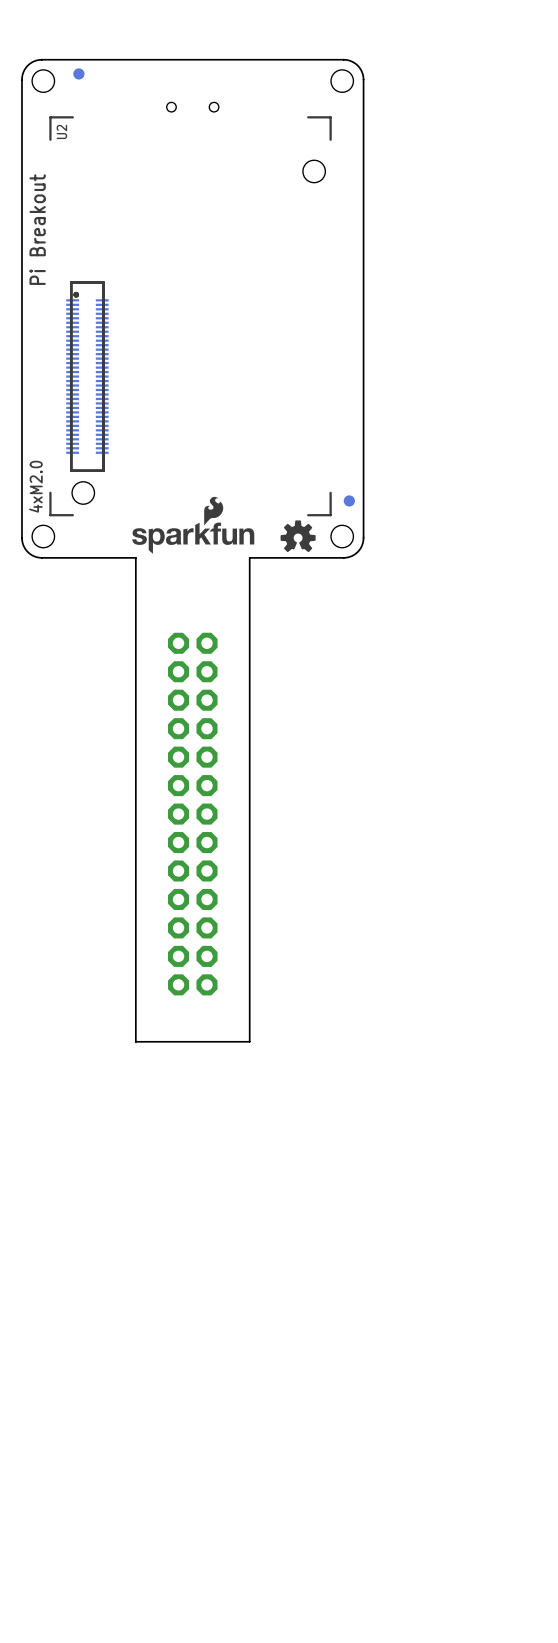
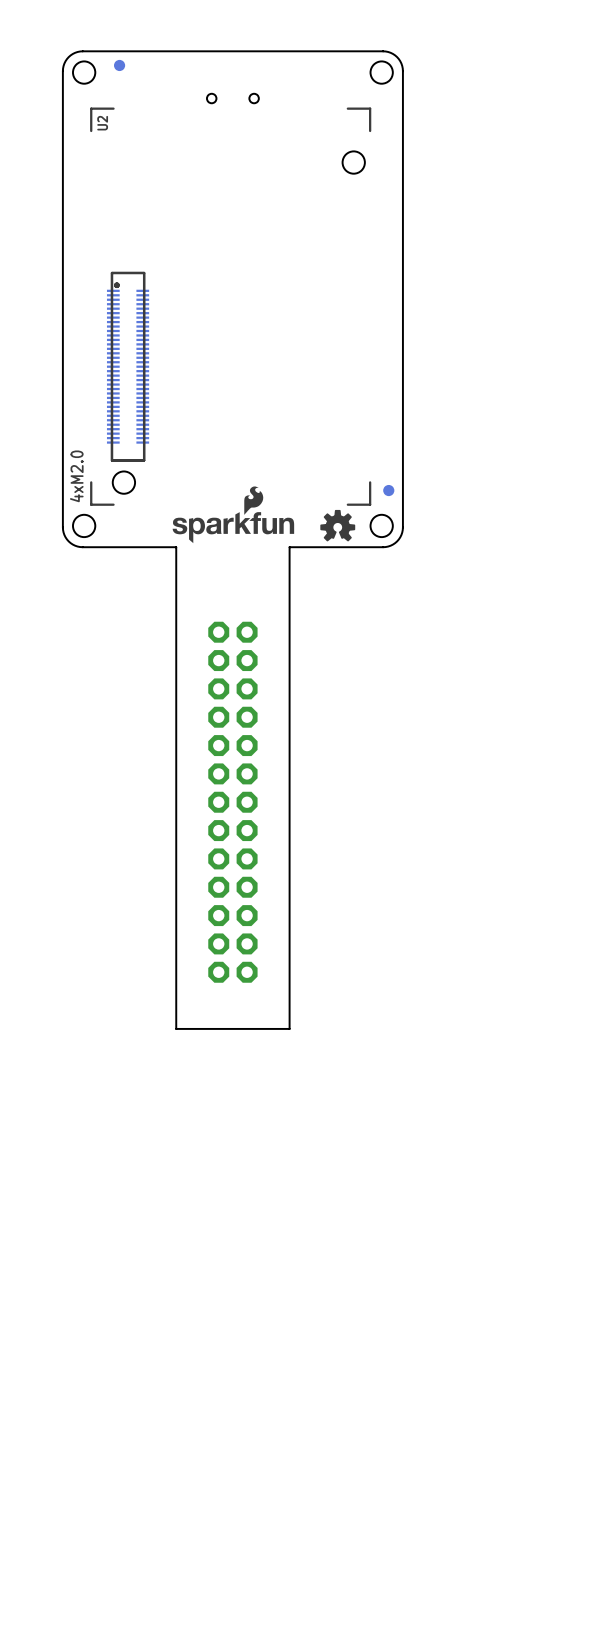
text: Pi Breakout (37, 229) -> none

